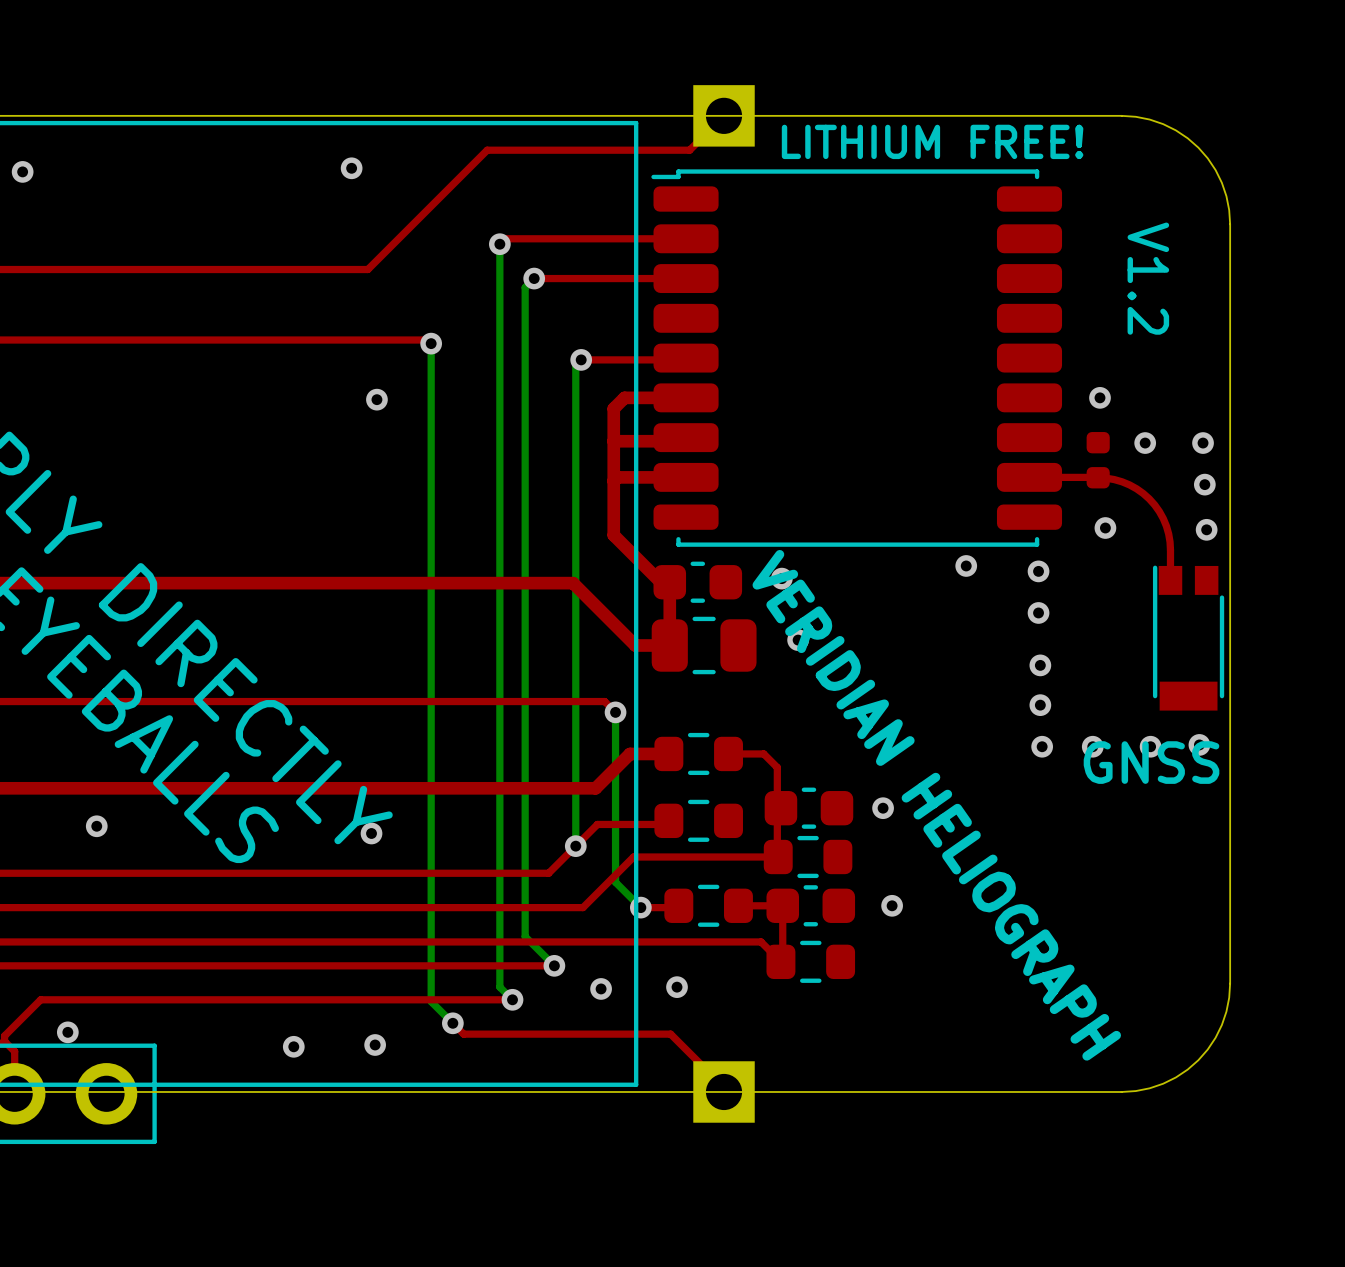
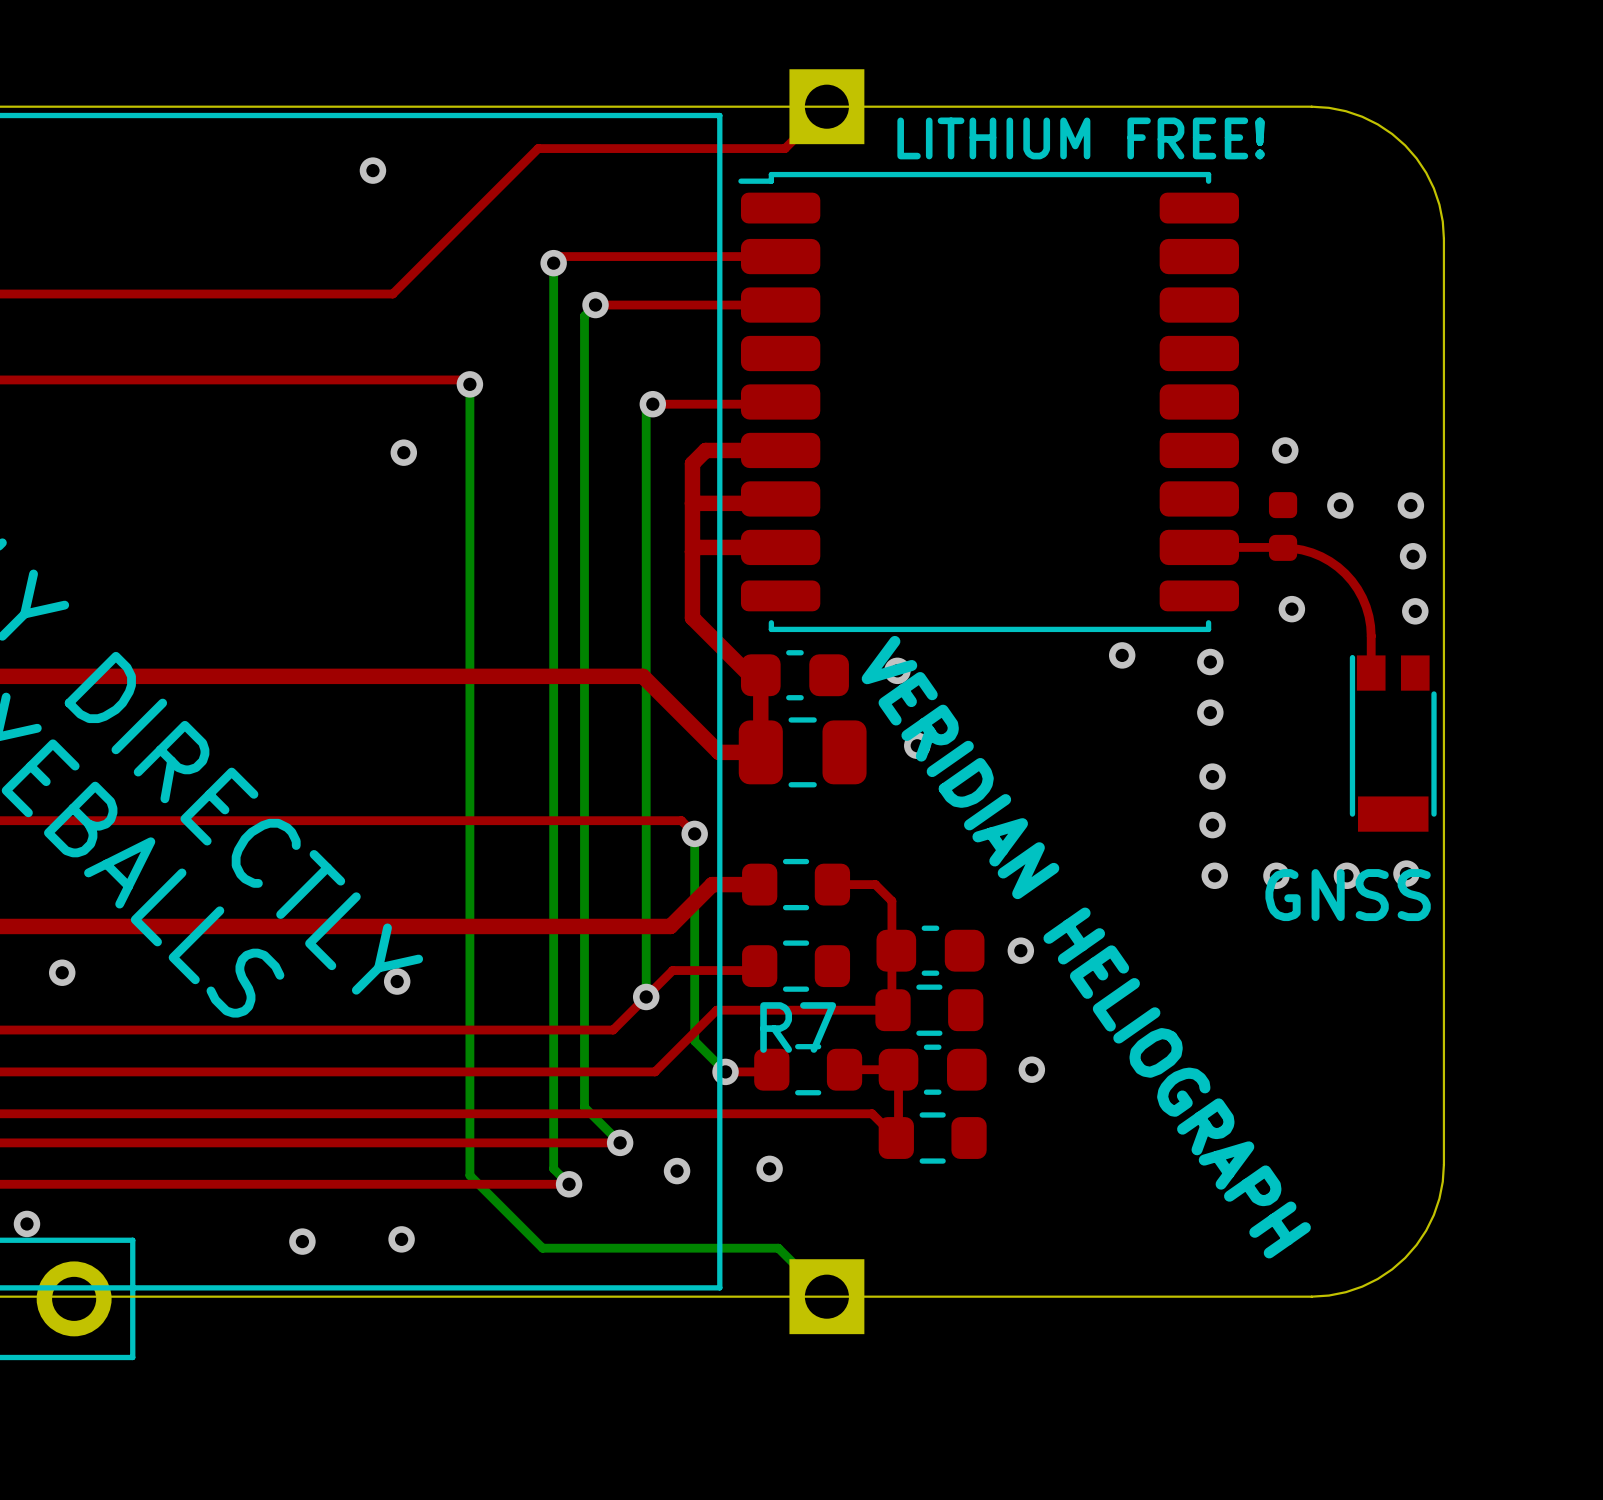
text: V1.2 (1148, 278) -> none
R7 name: none -> R7 (798, 1027)
bottom track: (431, 992) (431, 1001) (452, 1023) -> (469, 1175) (542, 1248) (778, 1248) (819, 1288)
top track: (452, 1023) (463, 1034) (670, 1034) (724, 1087) -> none
via: (452, 1023) -> none

